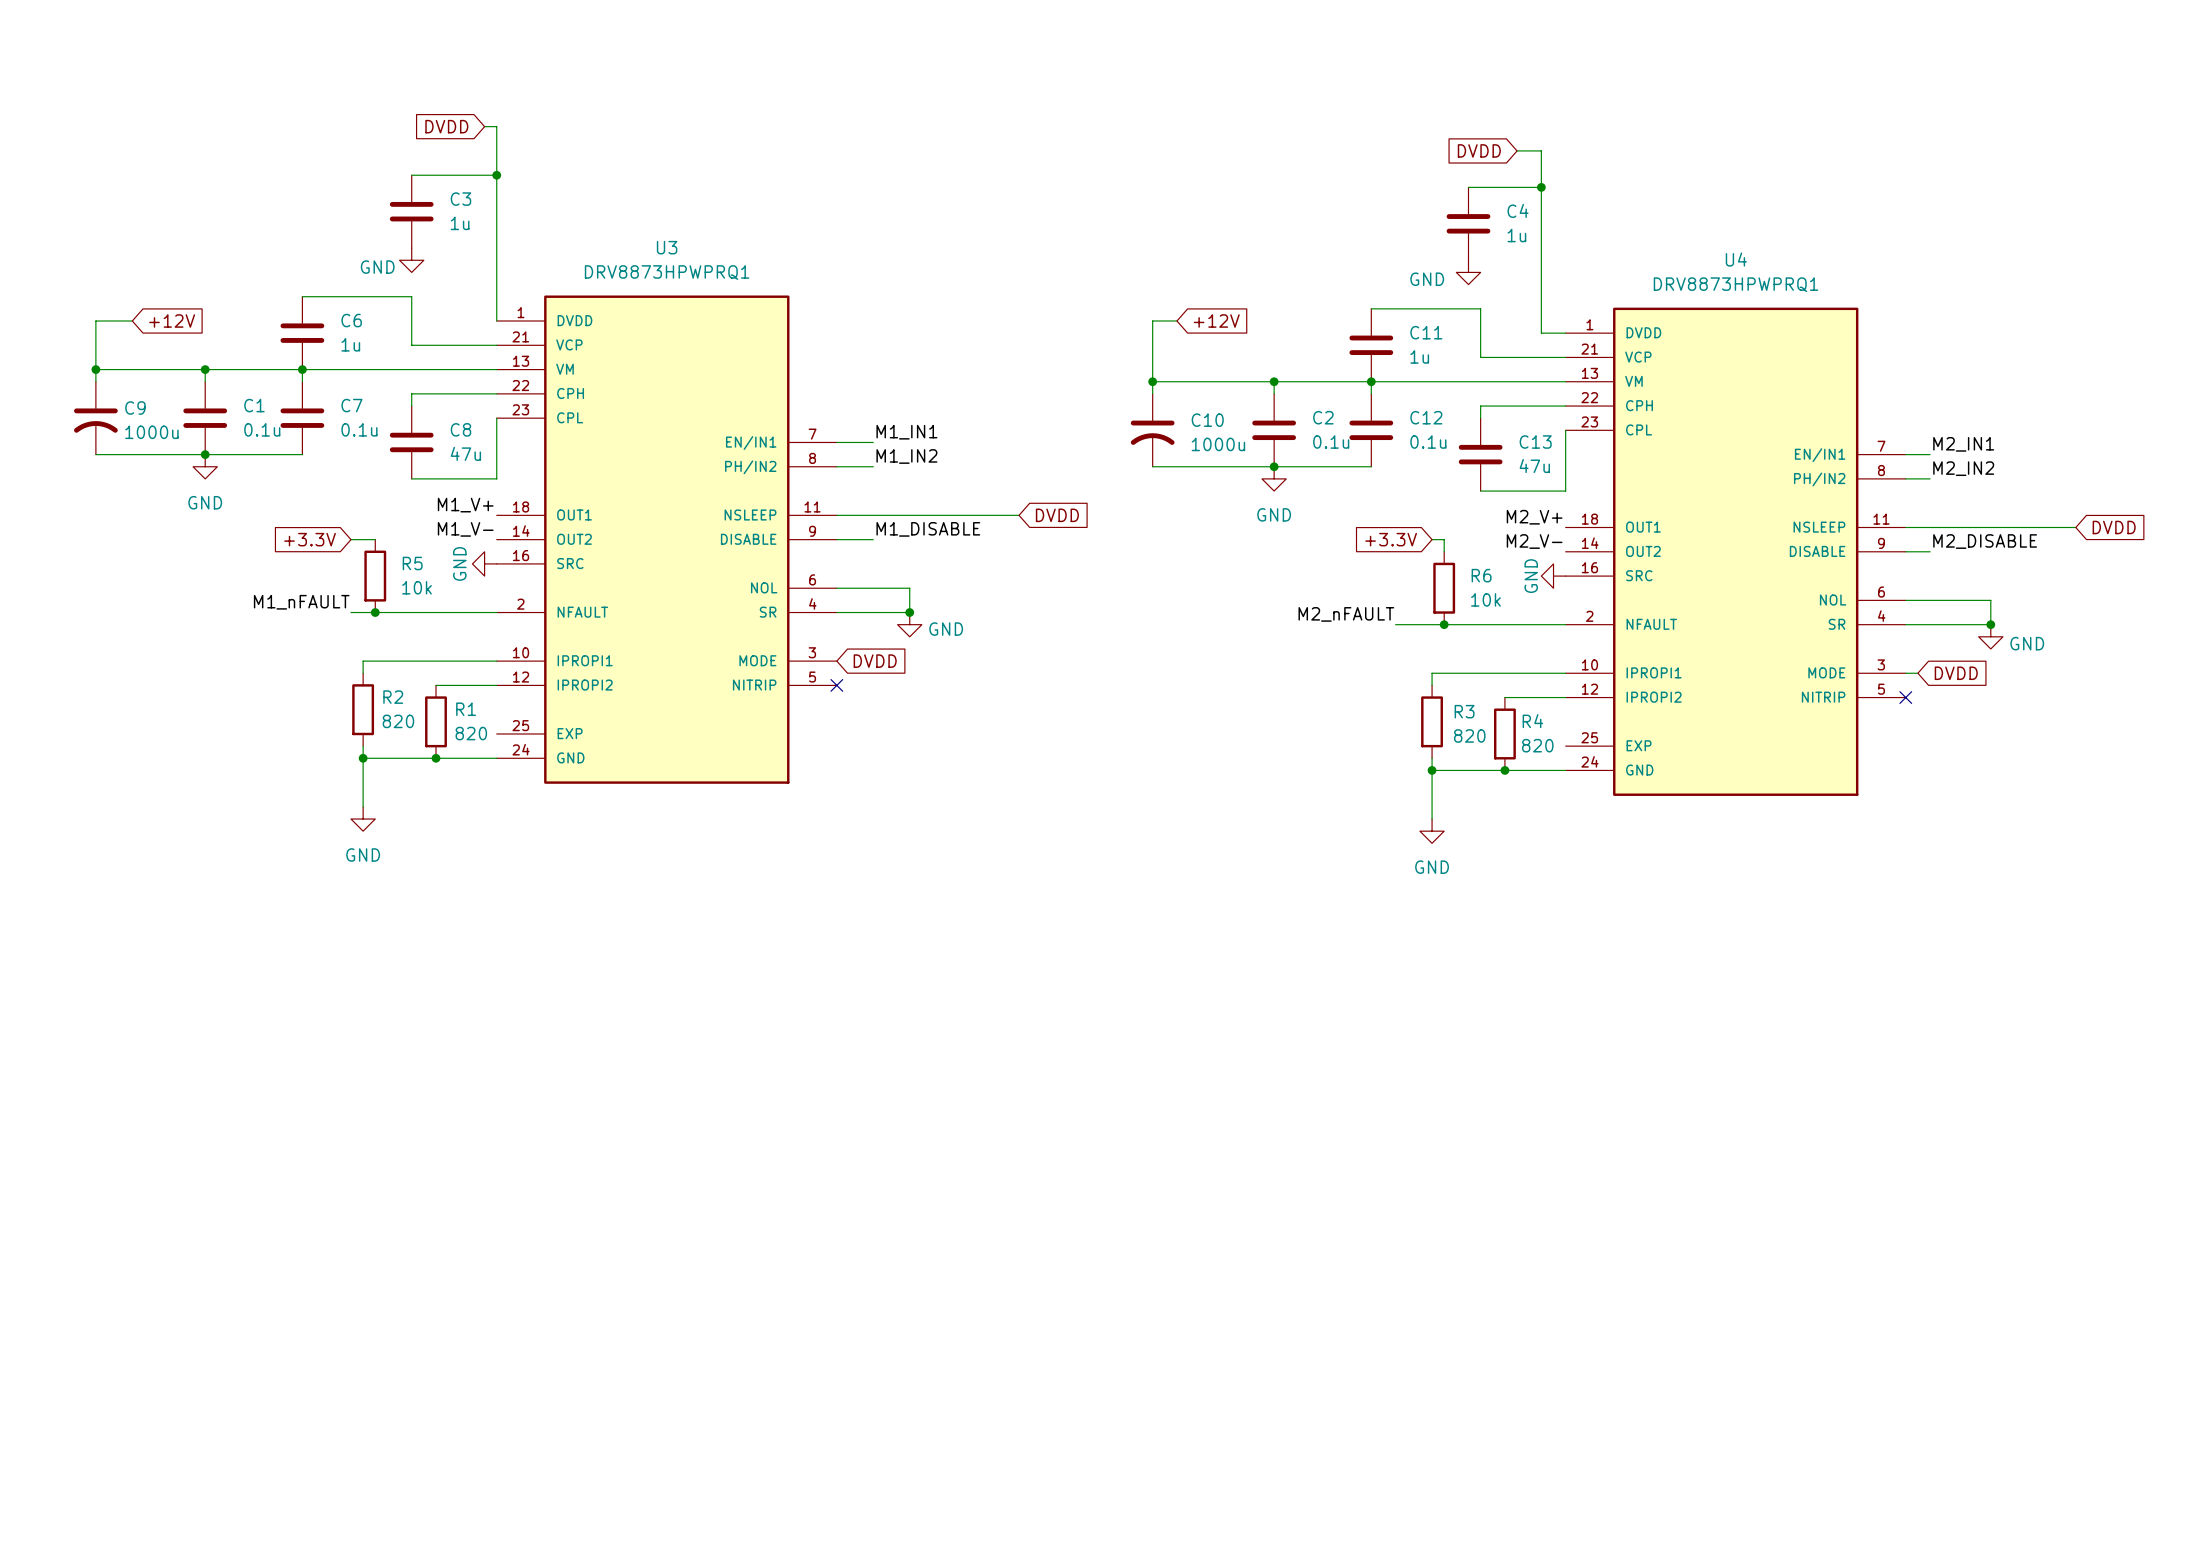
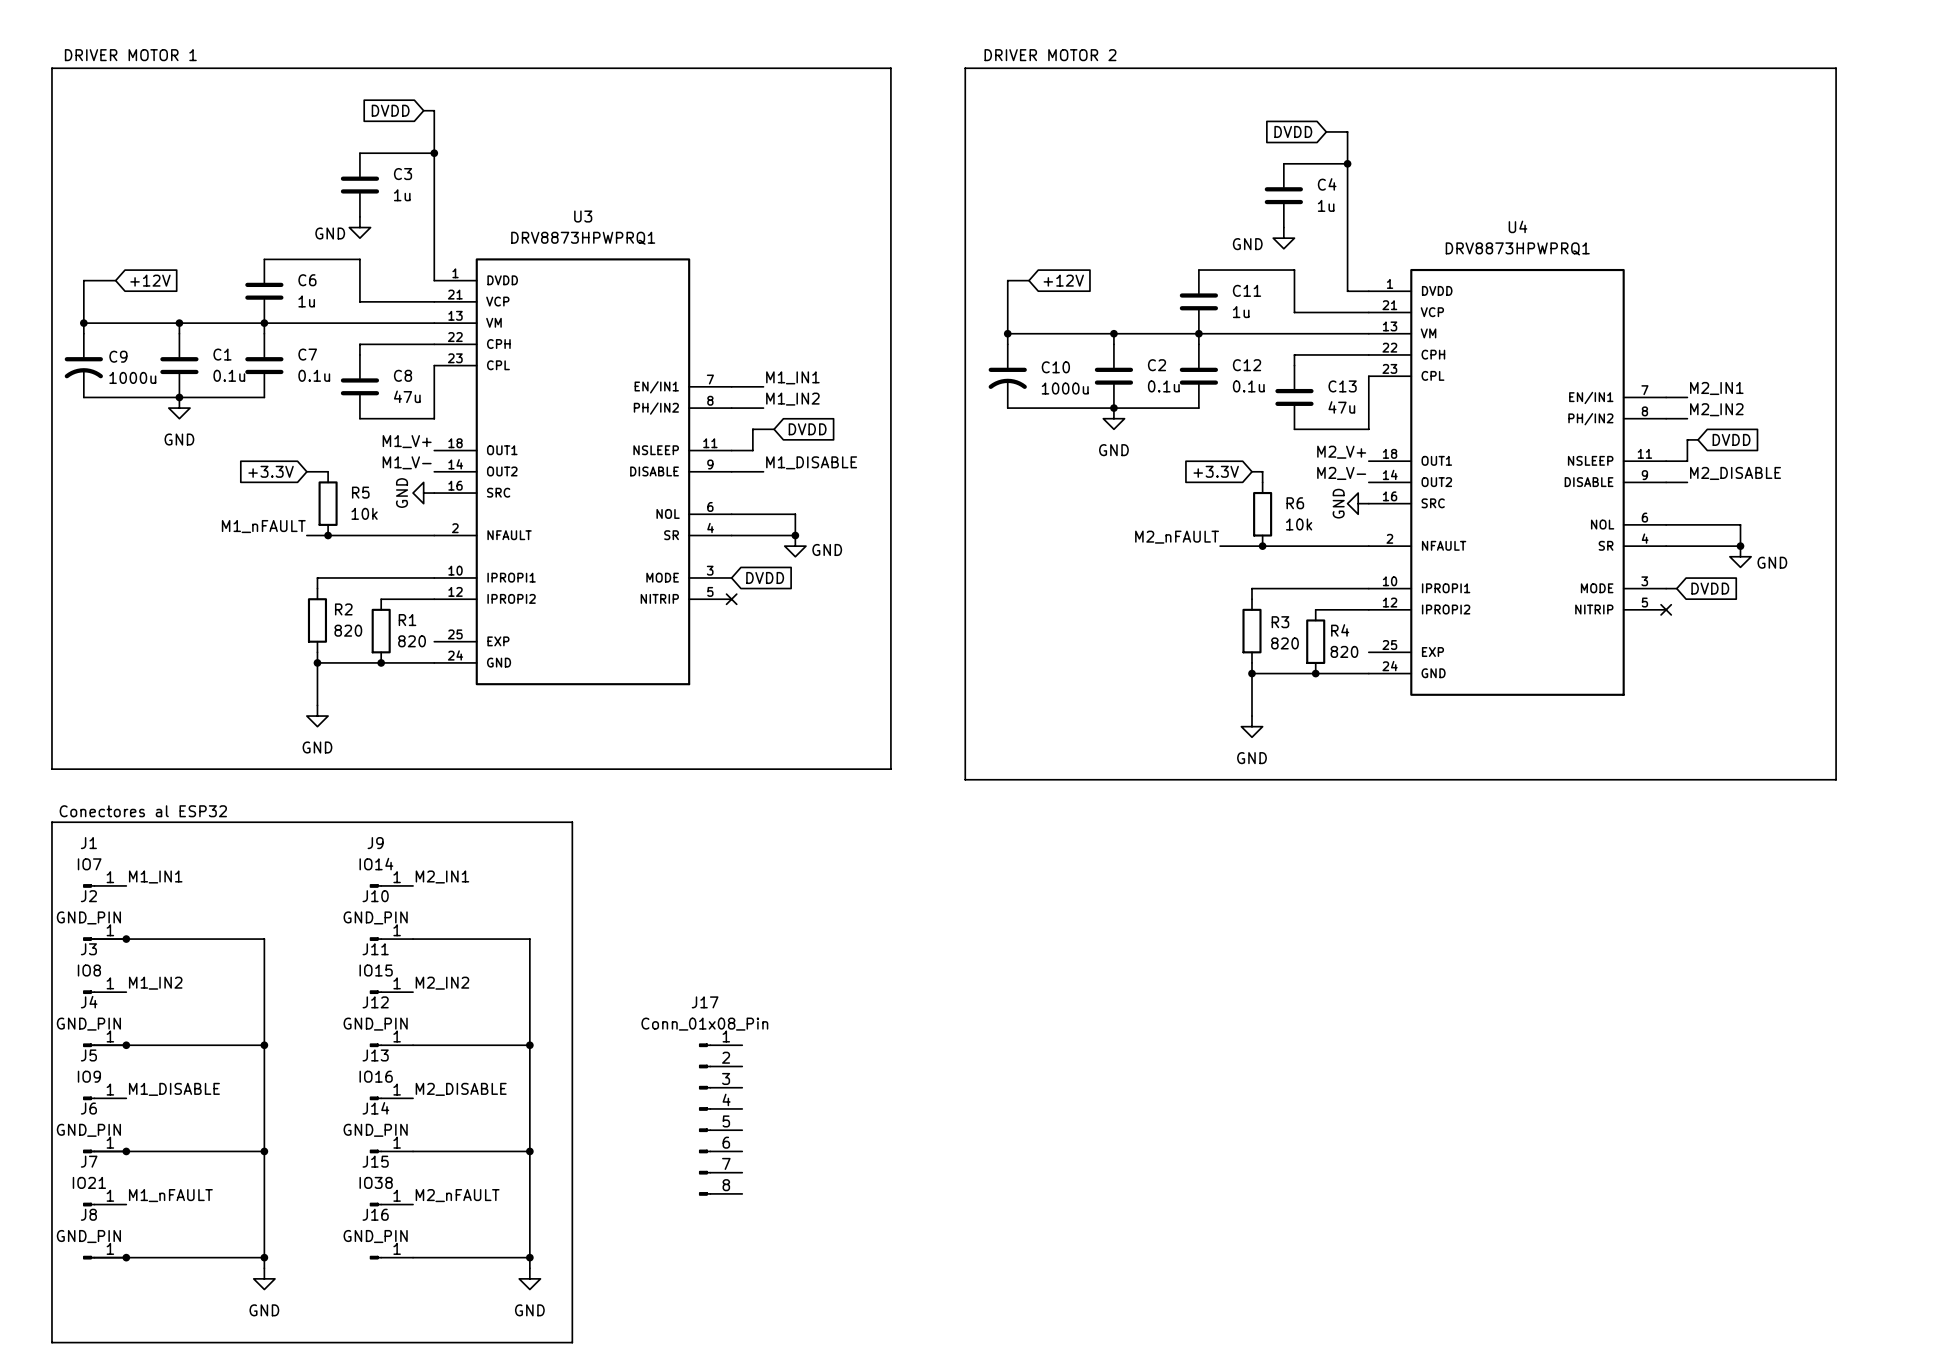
text: none -> DRIVER MOTOR 1 (130, 55)
text: none -> DRIVER MOTOR 2 (1050, 55)
line: none -> (51, 68) (890, 68) (890, 769) (51, 769) (51, 68)
line: none -> (965, 68) (1836, 68) (1836, 779) (965, 779) (965, 68)
wire: (861, 515) (1019, 515) -> (752, 450) (752, 429) (774, 429)
global label position: DVDD (1057, 515) -> DVDD (807, 429)
wire: (1930, 527) (2075, 527) -> (1687, 461) (1687, 439) (1698, 439)
global label position: DVDD (2114, 527) -> DVDD (1731, 439)
text: none -> Conectores al ESP32 (143, 811)
line: none -> (51, 822) (572, 822) (572, 1342) (51, 1342) (51, 822)
label: none -> M1_IN1 (155, 876)
label: none -> M2_IN1 (442, 876)
J1: none -> IO7 (104, 885)
J9: none -> IO14 (391, 885)
wire: none -> (83, 939) (264, 939) (264, 1268)
J2: none -> GND_PIN (104, 939)
junction: none -> (126, 939)
J10: none -> GND_PIN (391, 939)
wire: none -> (413, 939) (529, 939) (529, 1268)
label: none -> M1_IN2 (155, 983)
label: none -> M2_IN2 (442, 983)
J3: none -> IO8 (104, 992)
J11: none -> IO15 (391, 992)
wire: none -> (83, 1045) (264, 1045)
J4: none -> GND_PIN (104, 1045)
junction: none -> (126, 1045)
junction: none -> (264, 1045)
J12: none -> GND_PIN (391, 1045)
wire: none -> (413, 1045) (529, 1045)
junction: none -> (529, 1045)
label: none -> M1_DISABLE (174, 1089)
label: none -> M2_DISABLE (461, 1089)
J5: none -> IO9 (104, 1098)
J13: none -> IO16 (391, 1098)
J17: none -> Conn_01x08_Pin (720, 1119)
wire: none -> (83, 1151) (264, 1151)
J6: none -> GND_PIN (104, 1151)
junction: none -> (126, 1151)
junction: none -> (264, 1151)
J14: none -> GND_PIN (391, 1151)
wire: none -> (413, 1151) (529, 1151)
junction: none -> (529, 1151)
label: none -> M1_nFAULT (170, 1195)
label: none -> M2_nFAULT (457, 1195)
J7: none -> IO21 (104, 1204)
J15: none -> IO38 (391, 1204)
wire: none -> (83, 1257) (264, 1257)
J8: none -> GND_PIN (104, 1257)
junction: none -> (126, 1257)
junction: none -> (264, 1257)
J16: none -> GND_PIN (391, 1257)
wire: none -> (413, 1257) (529, 1257)
junction: none -> (529, 1257)
power symbol: none -> GND (264, 1278)
power symbol: none -> GND (529, 1278)

